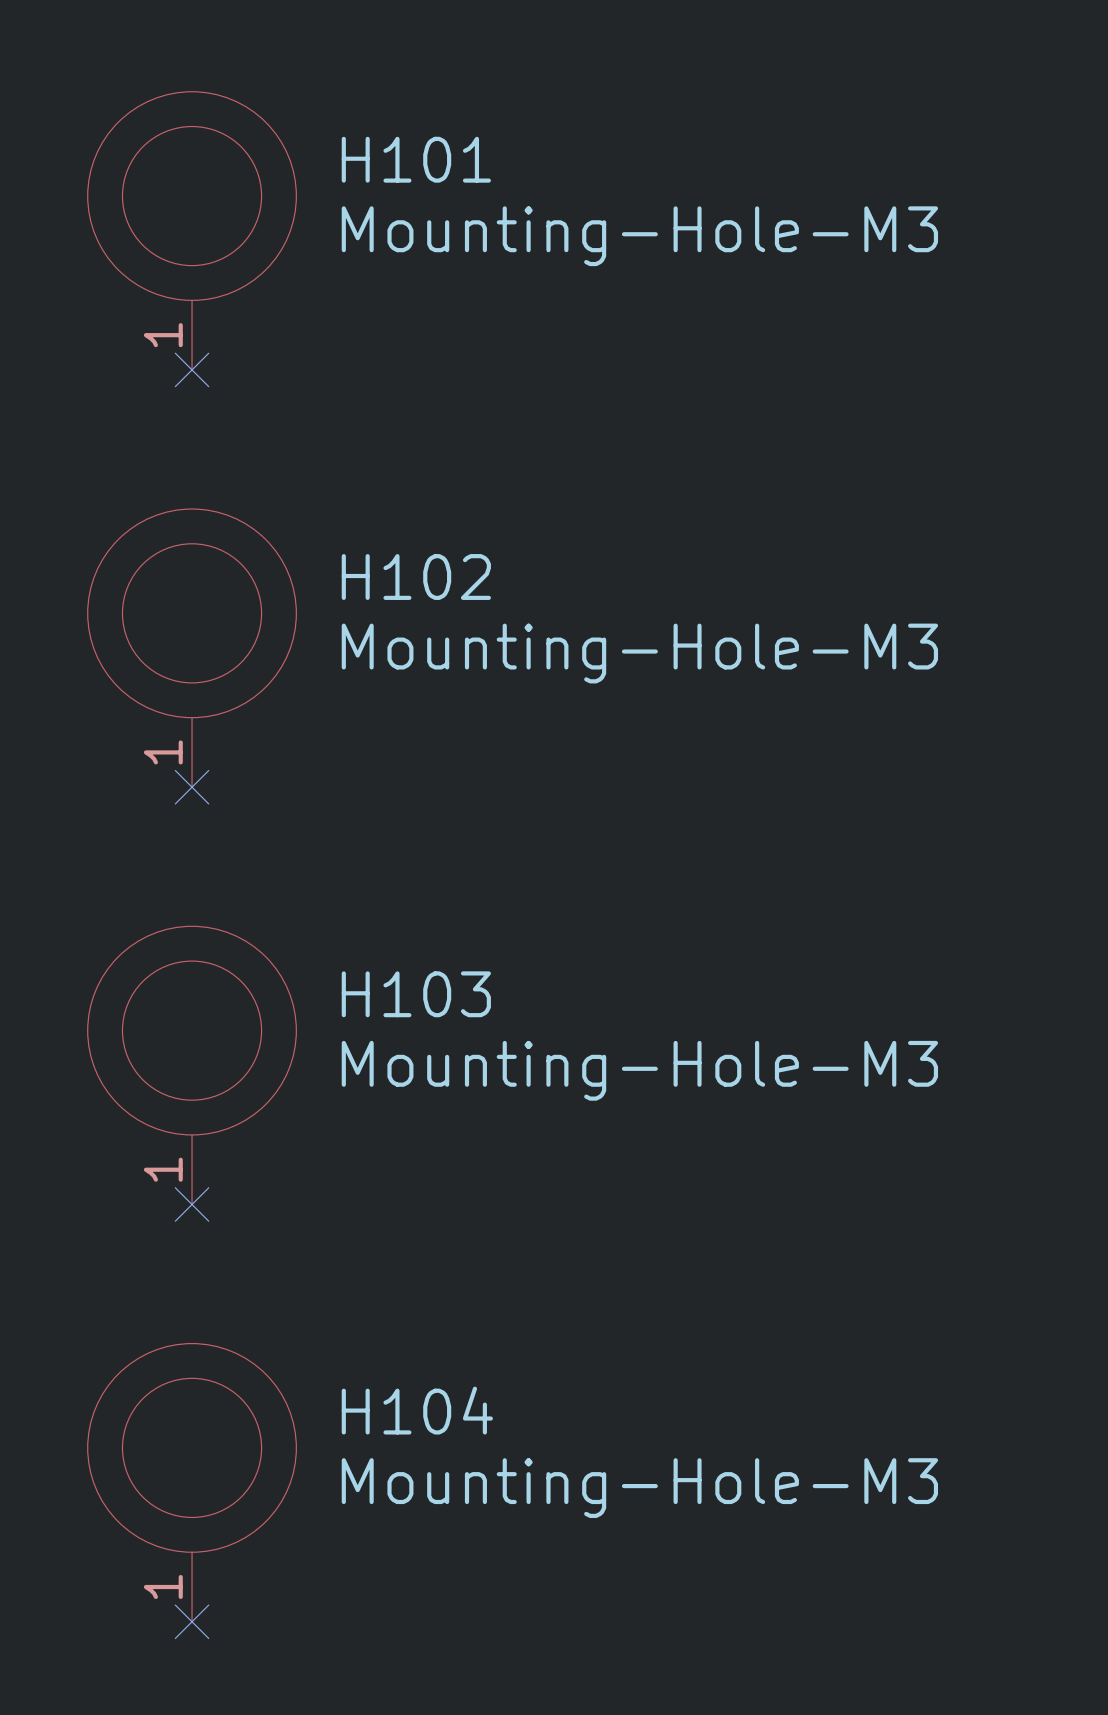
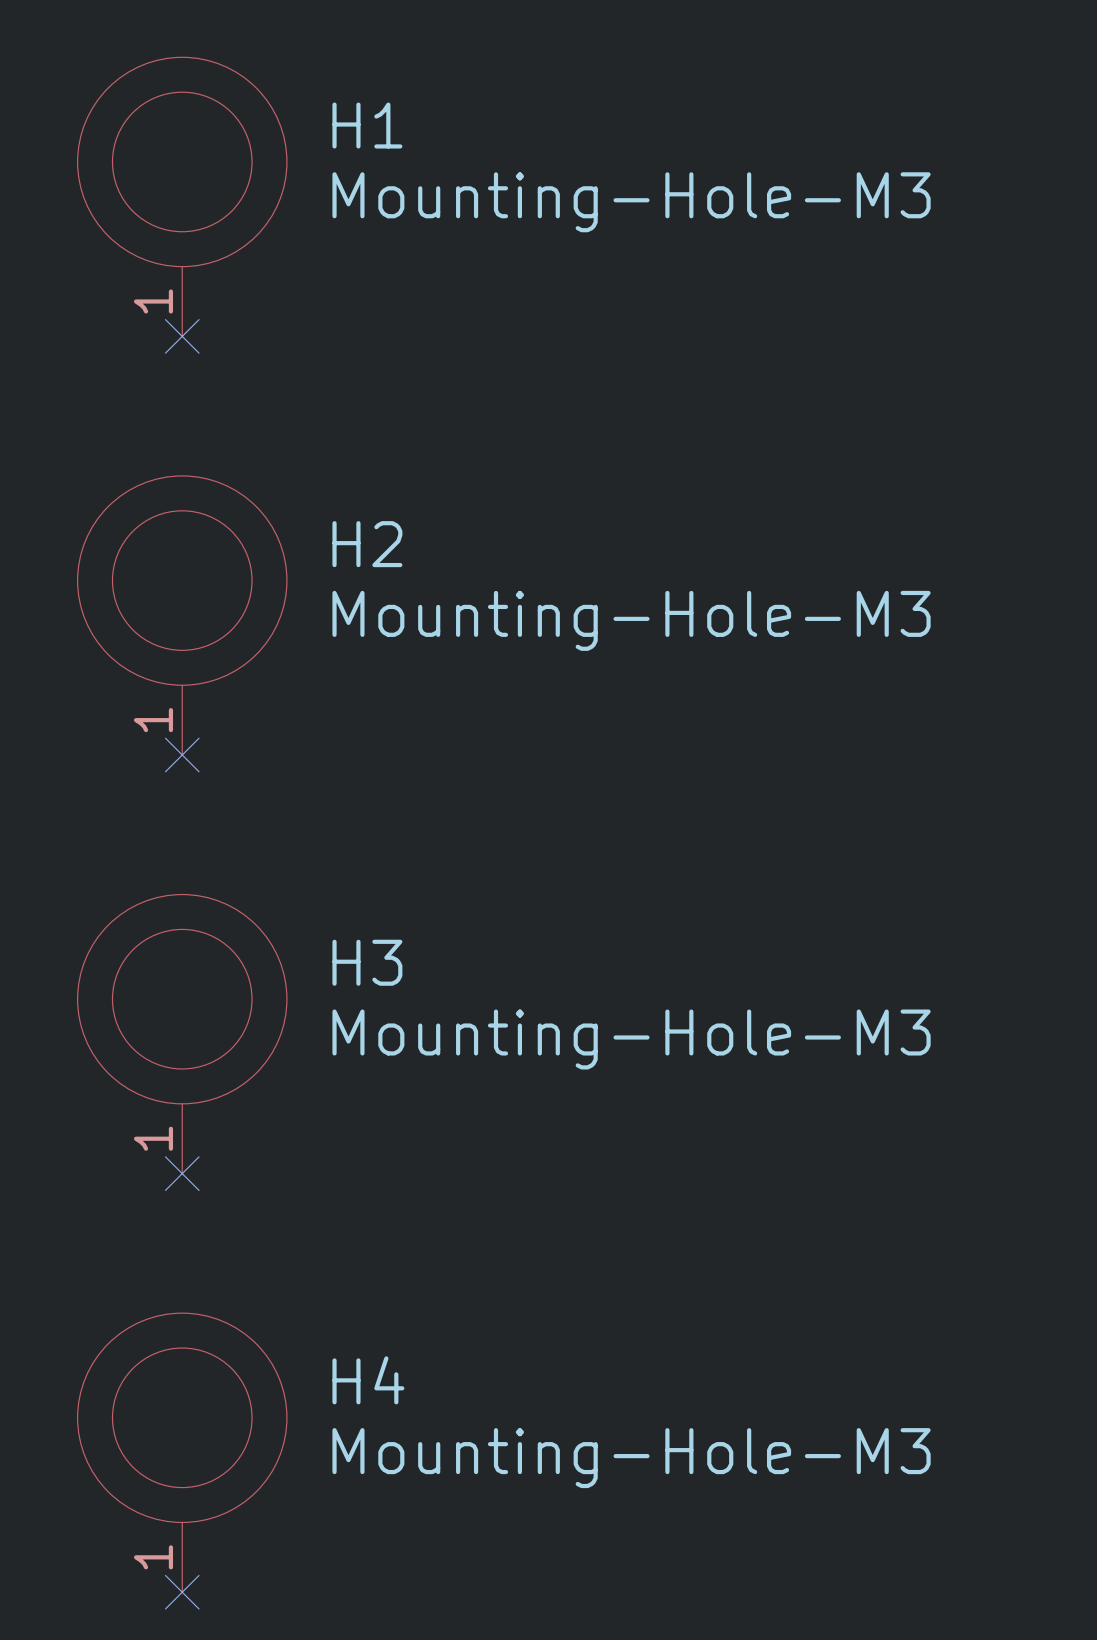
H101 name: H101 (416, 159) -> H1 (367, 125)
H102 name: H102 (416, 577) -> H2 (367, 544)
H103 name: H103 (416, 994) -> H3 (367, 962)
H104 name: H104 (417, 1410) -> H4 (368, 1380)

